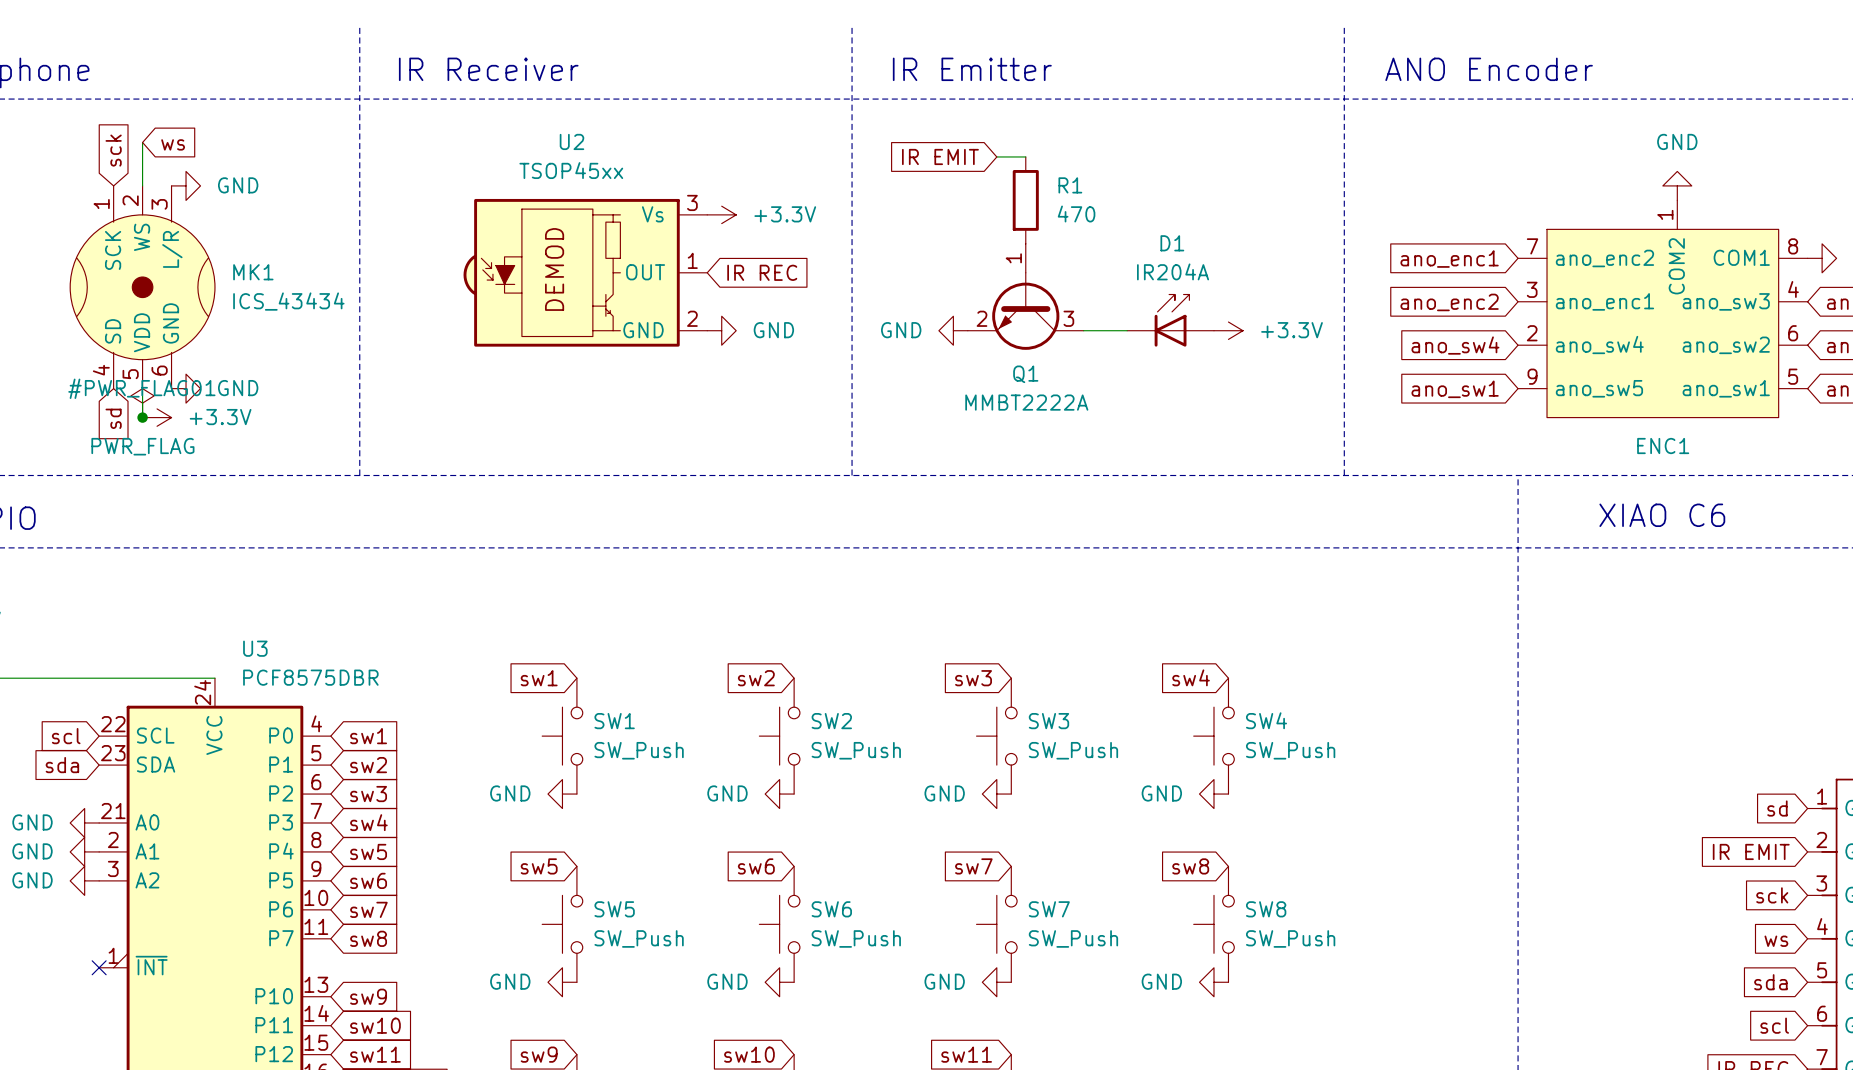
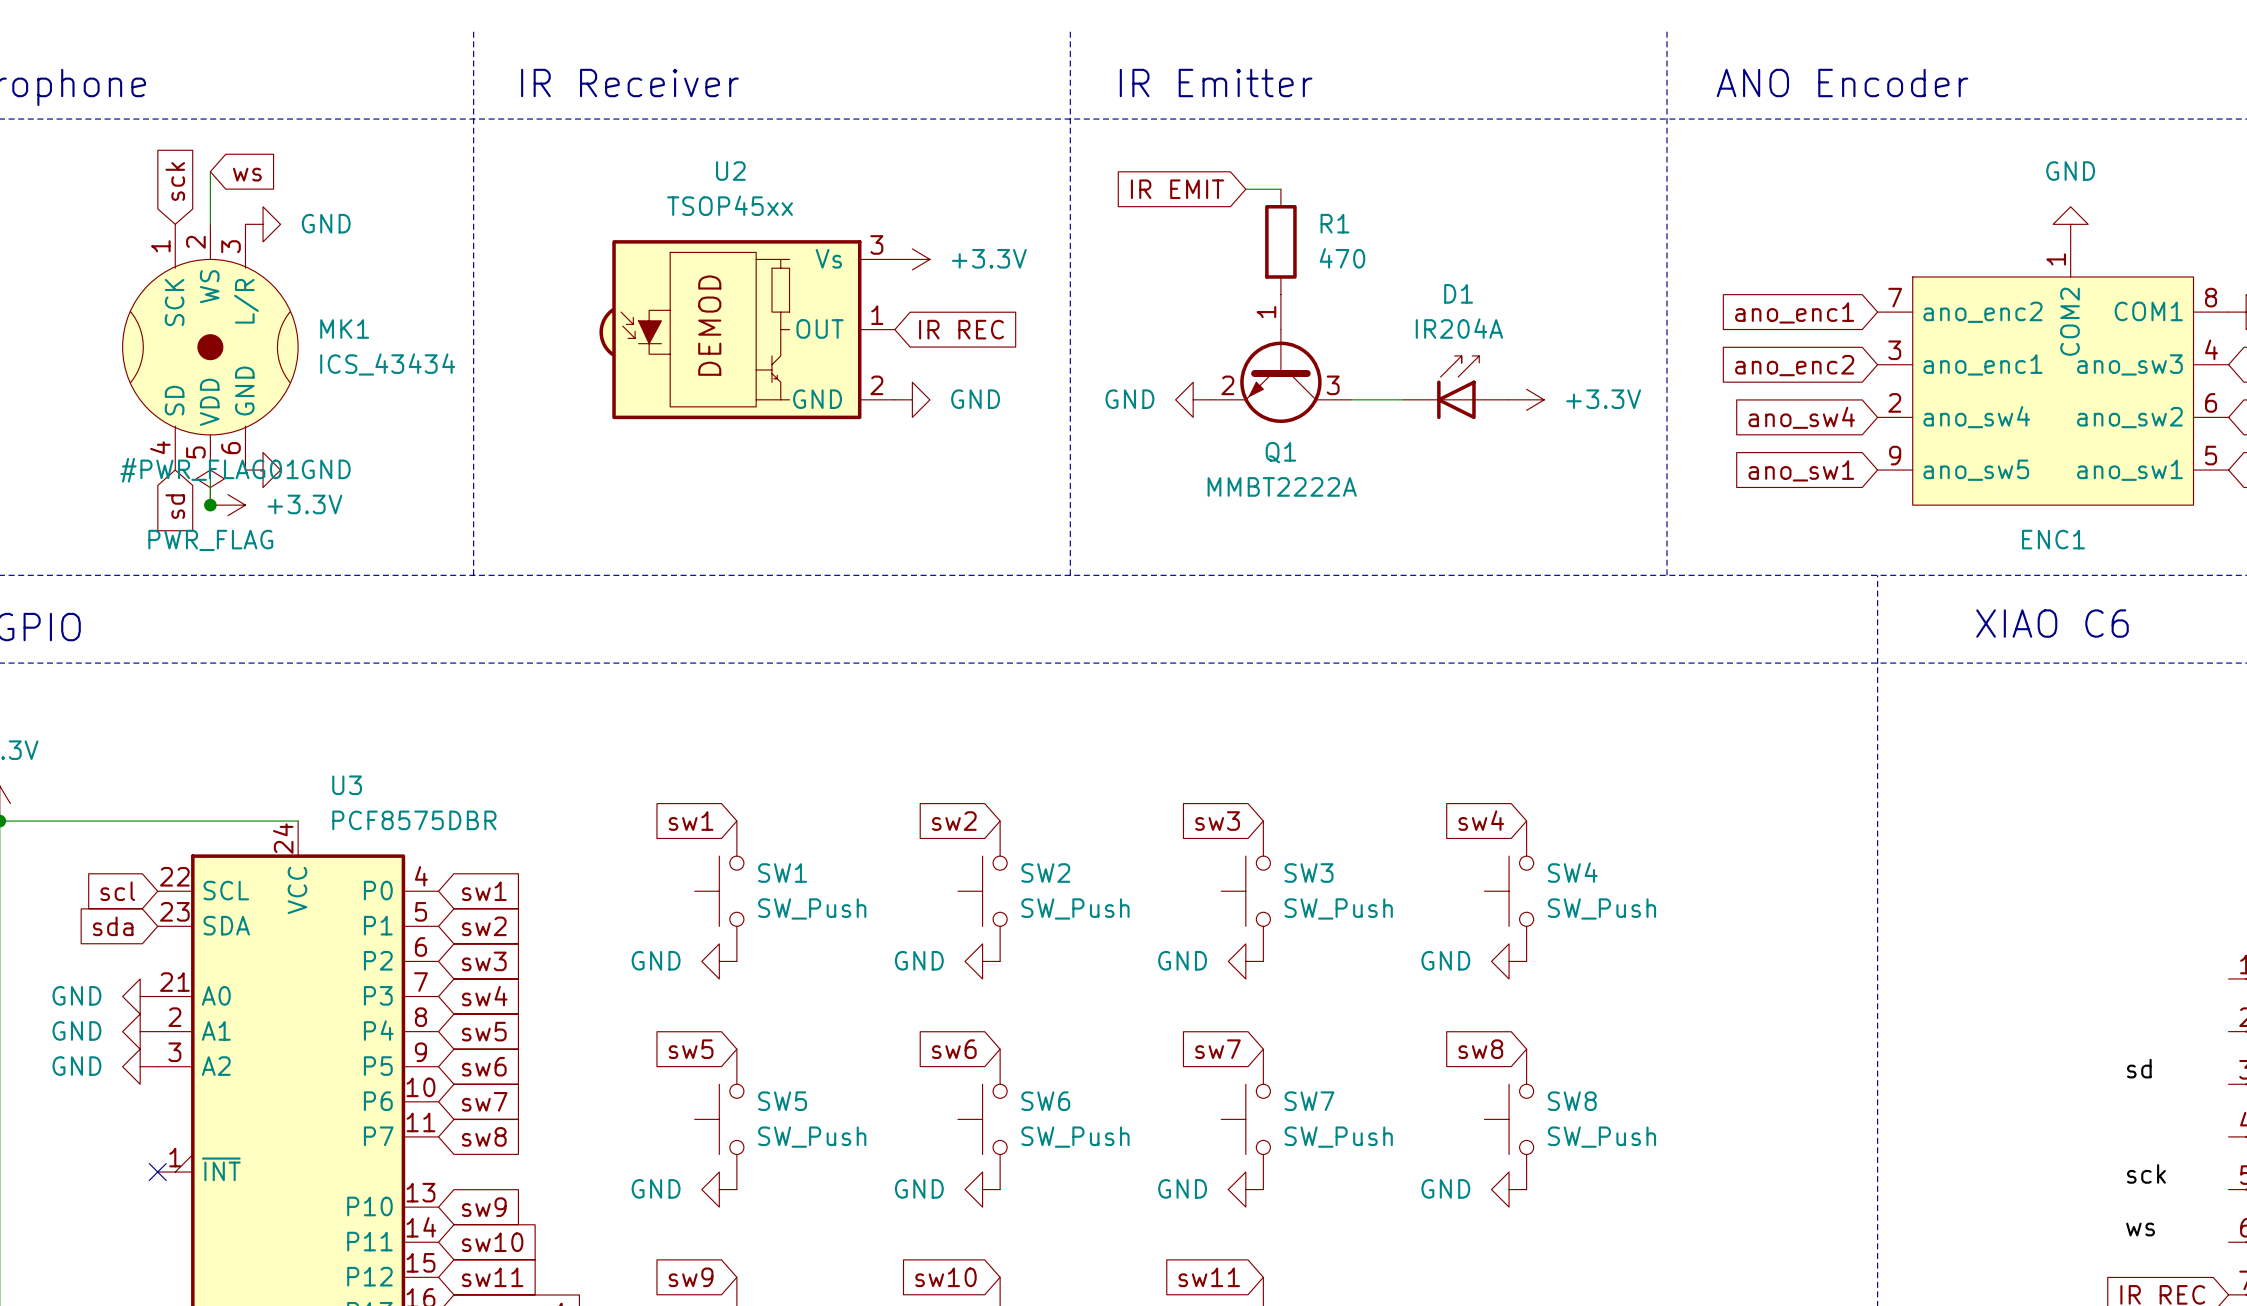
global label: sd (1777, 808) -> none
global label: IR EMIT (1751, 851) -> none
label: none -> sd (2139, 1068)
global label: sck (1772, 895) -> none
global label: ws (1776, 941) -> none
label: none -> sck (2146, 1173)
global label: sda (1770, 982) -> none
label: none -> ws (2140, 1229)
global label: scl (1774, 1025) -> none

